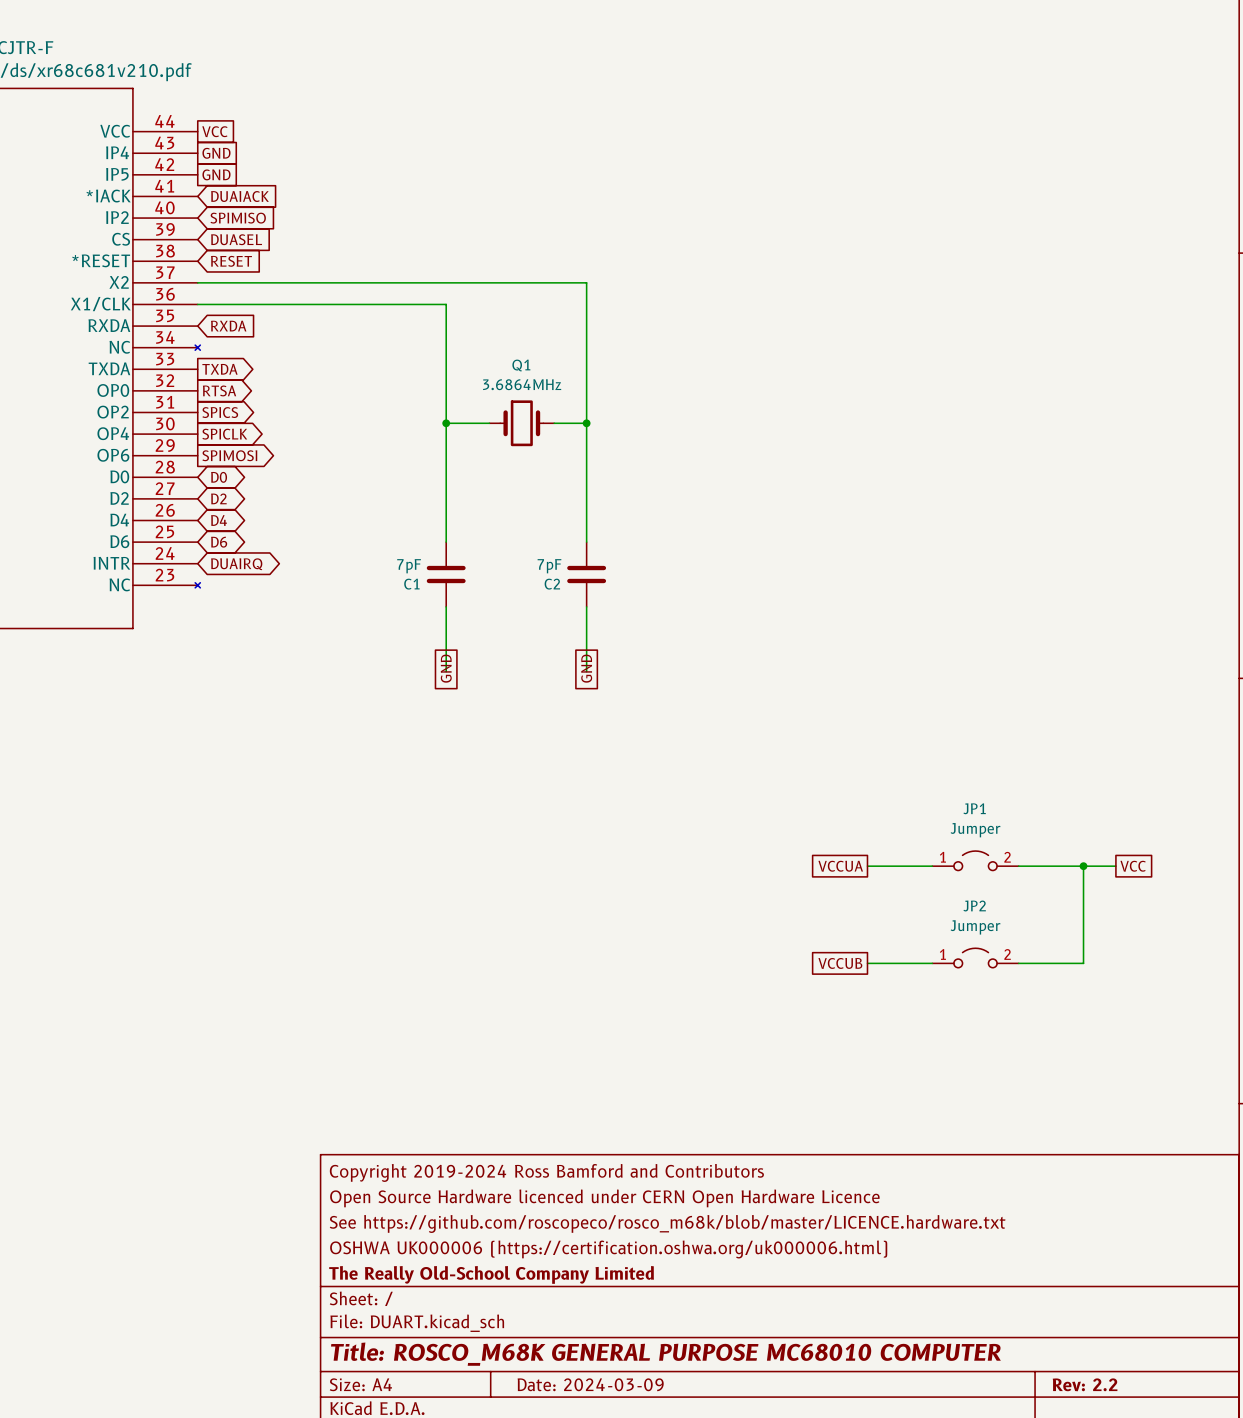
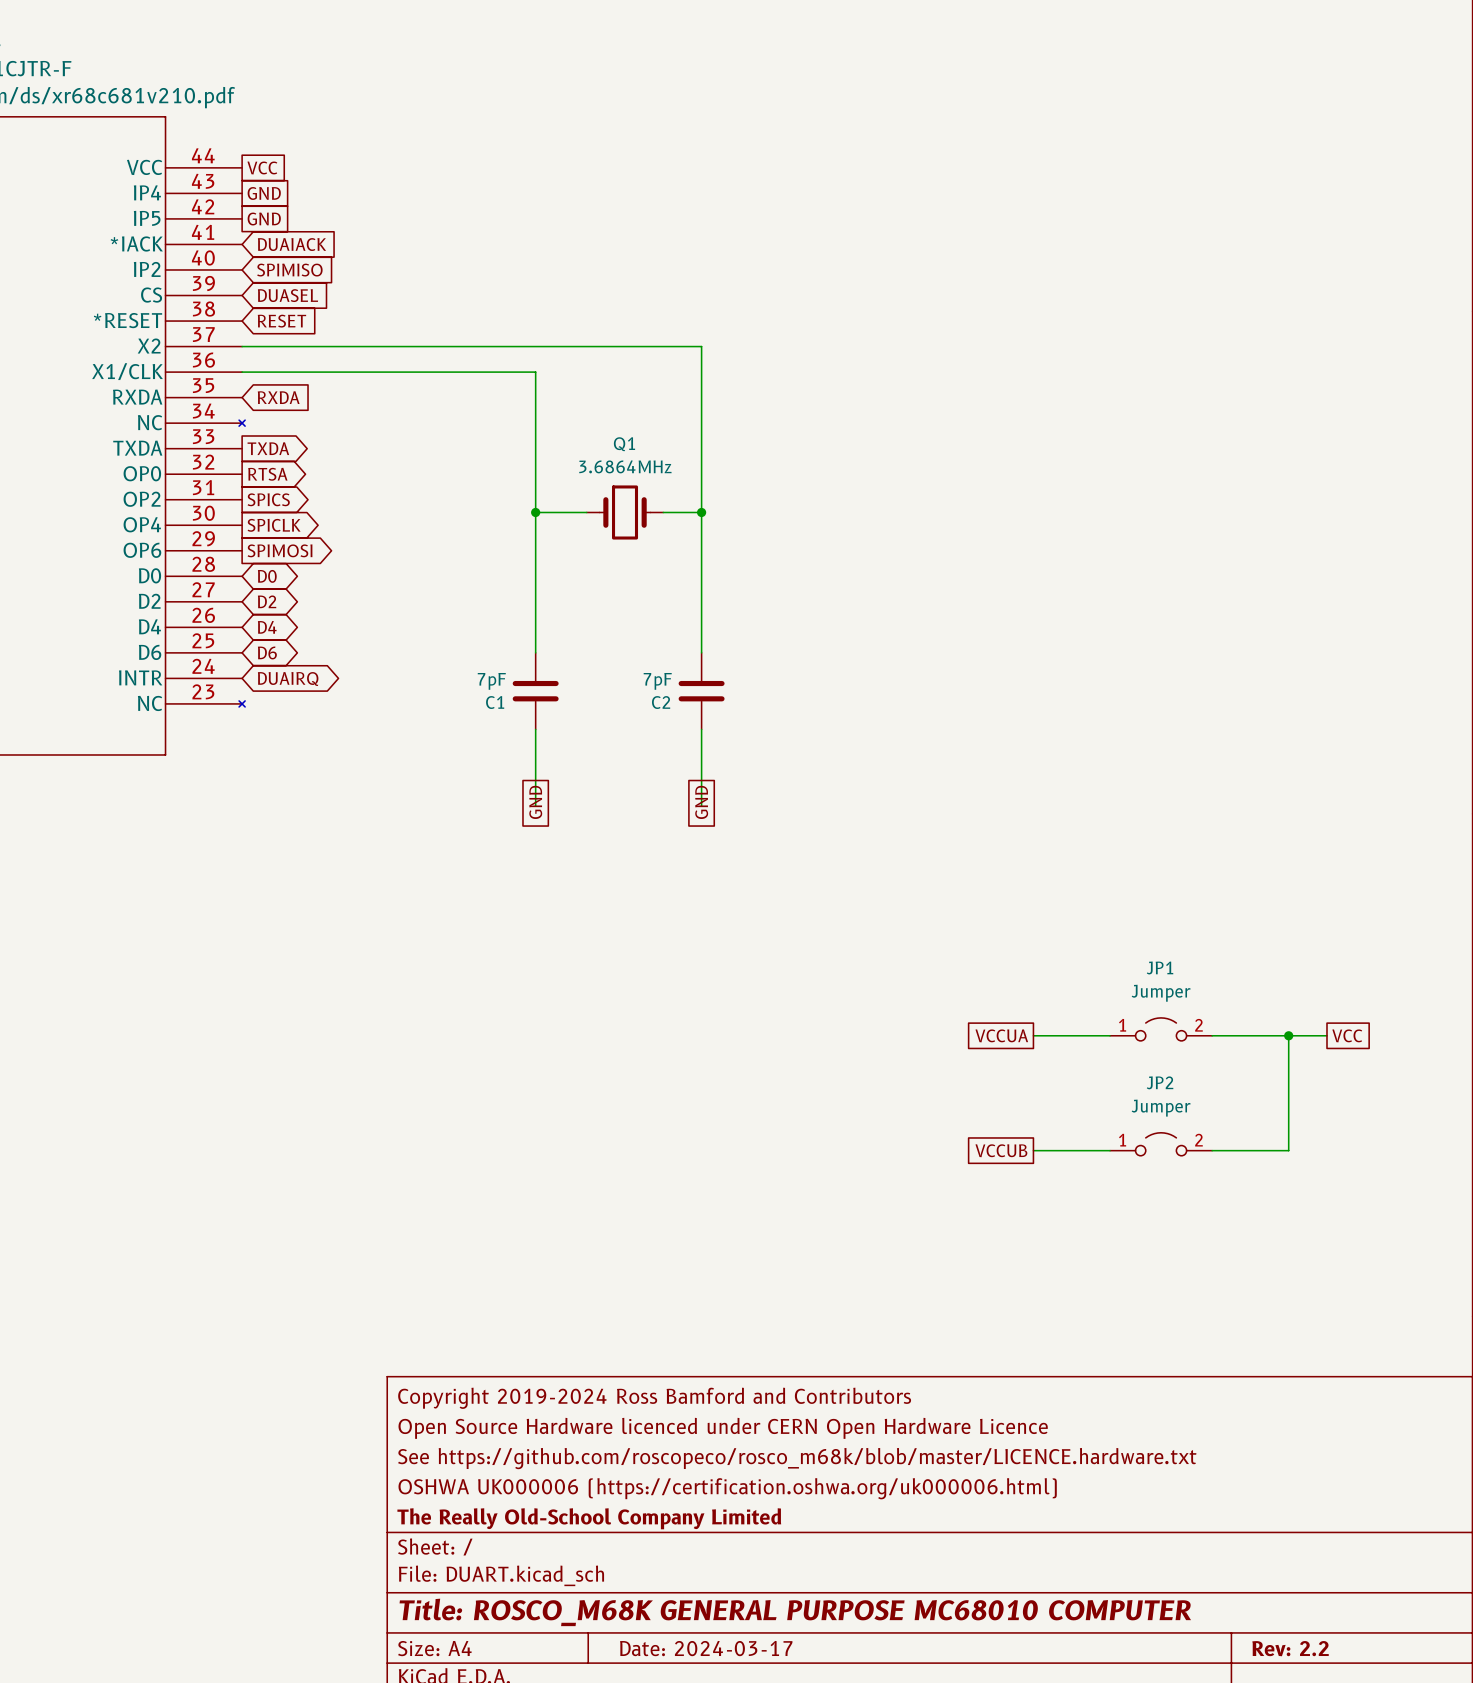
title block: Date: 2024-03-09 (590, 1384) -> Date: 2024-03-17 (706, 1648)

